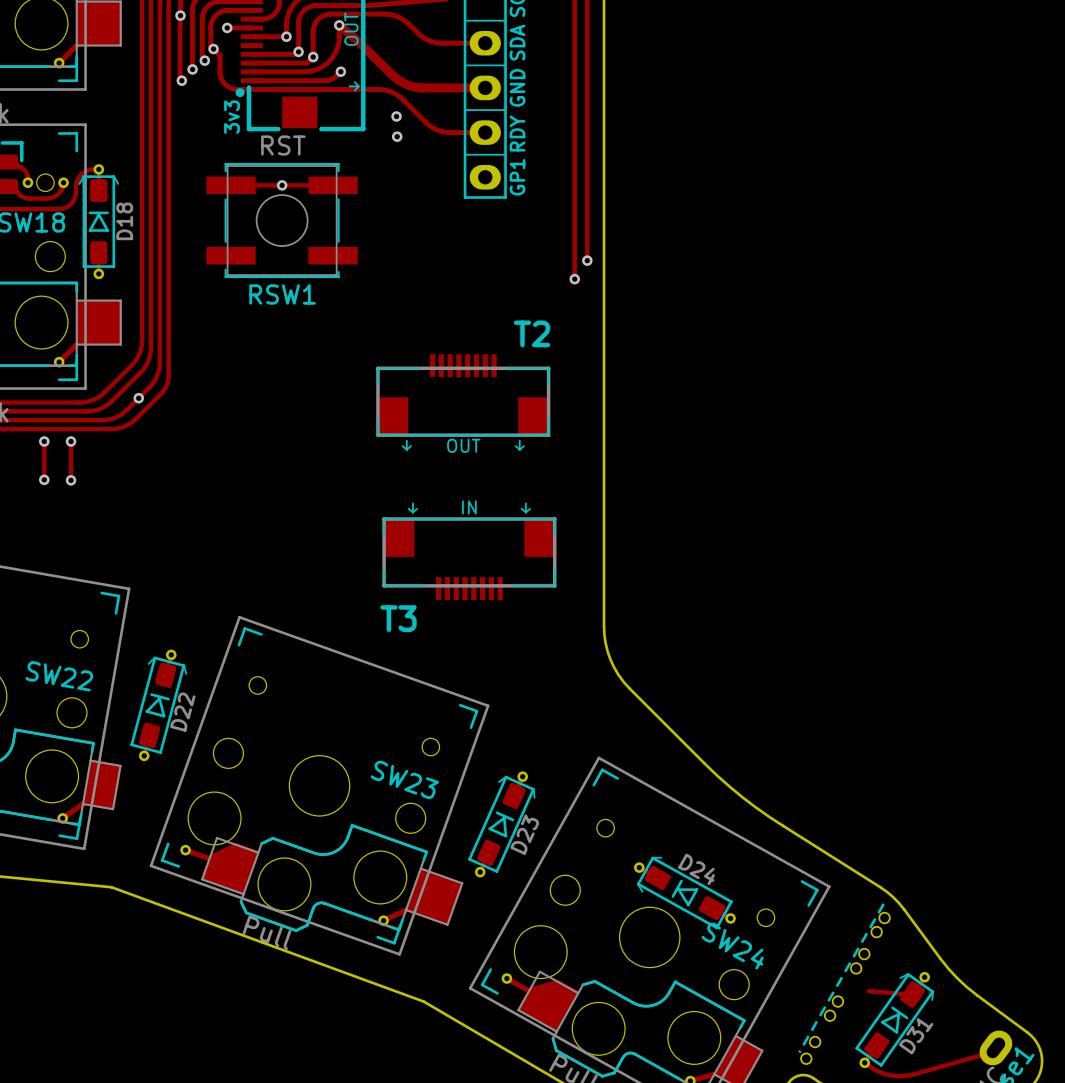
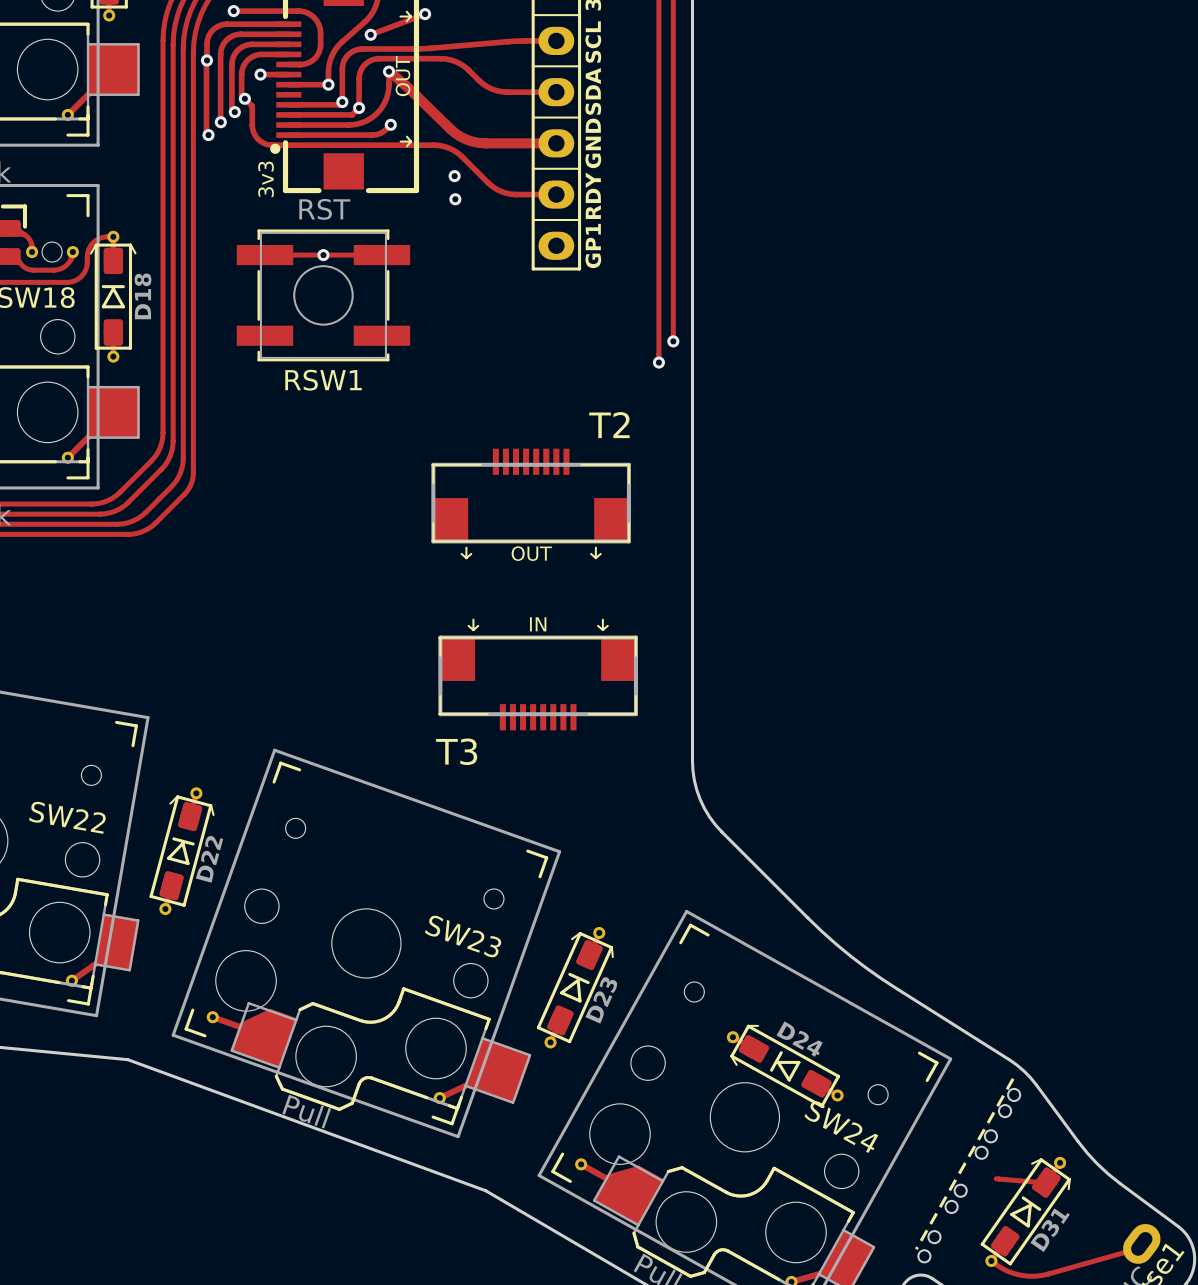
via: (138, 398) -> none
track: (44, 441) (44, 479) -> none
via: (44, 441) -> none
track: (71, 441) (71, 480) -> none
via: (71, 441) -> none
via: (44, 479) -> none
via: (71, 480) -> none

